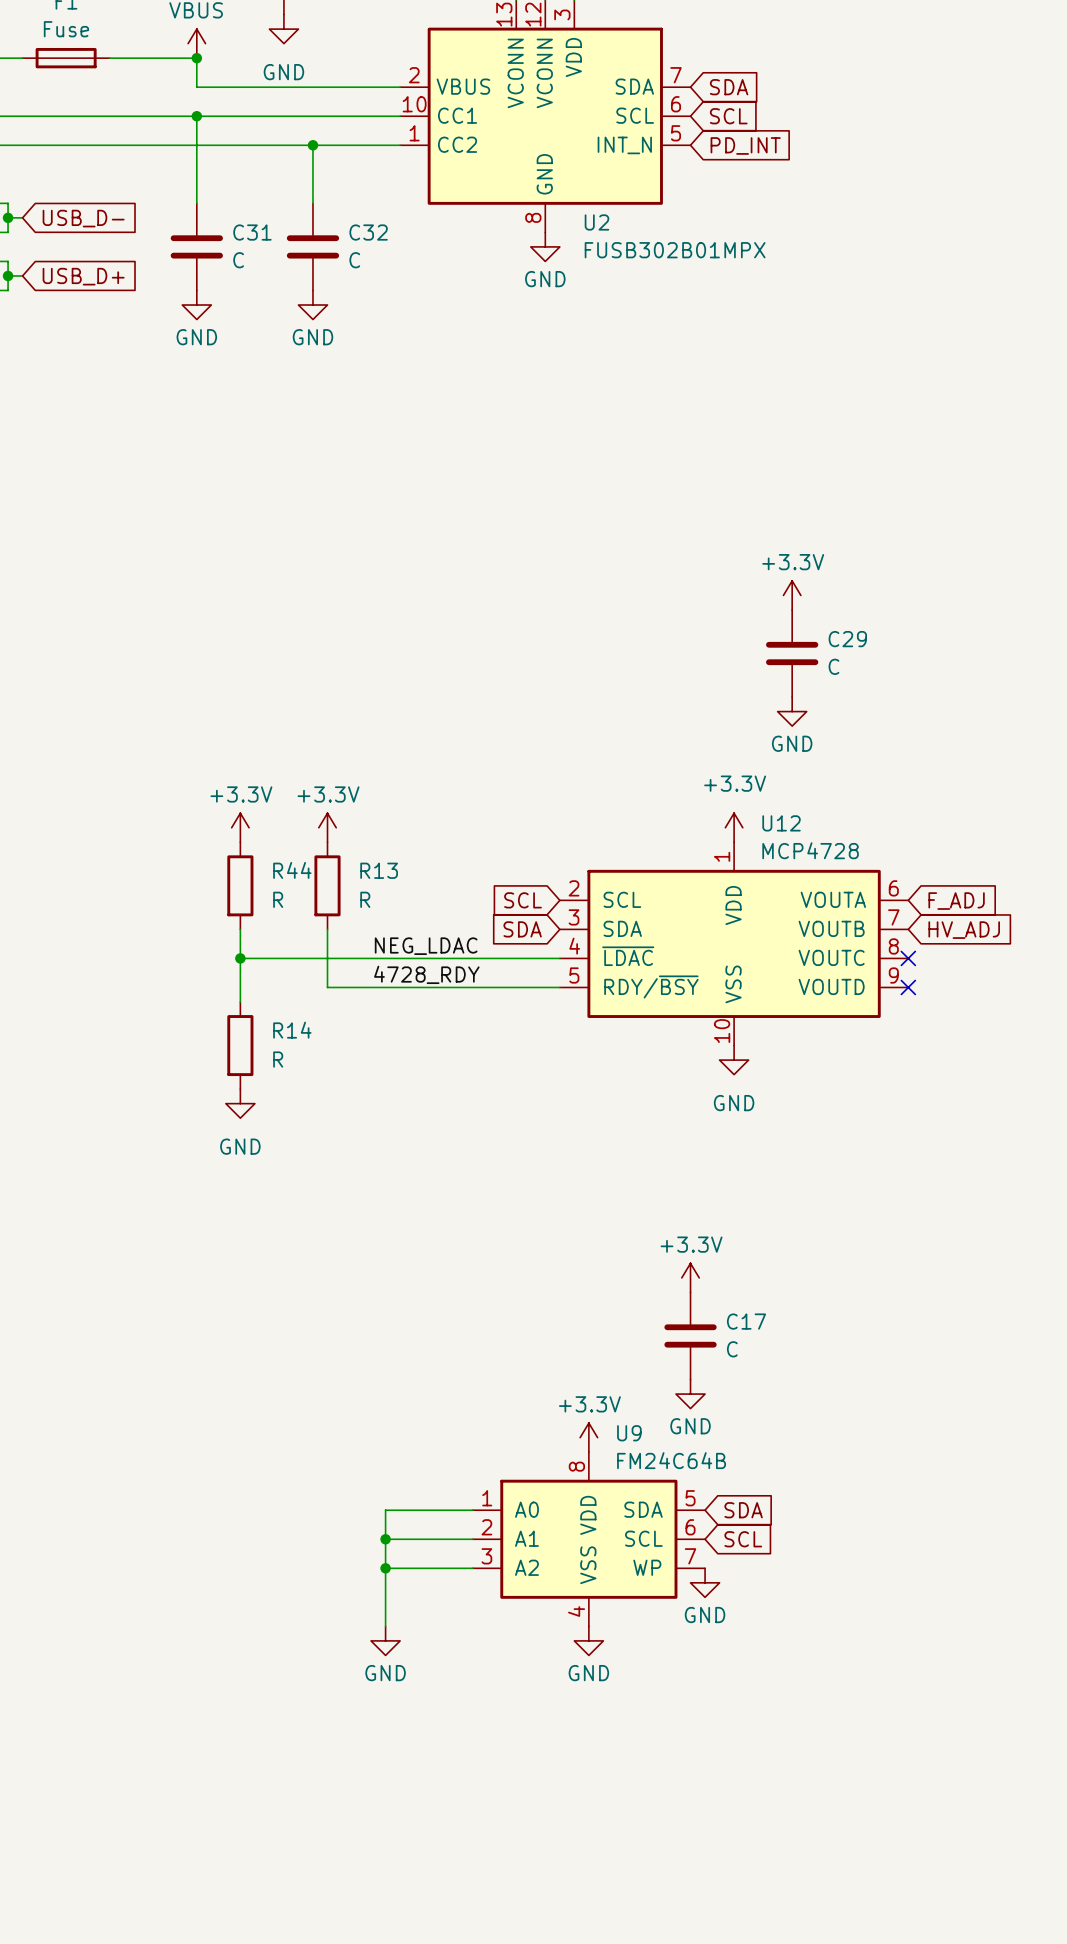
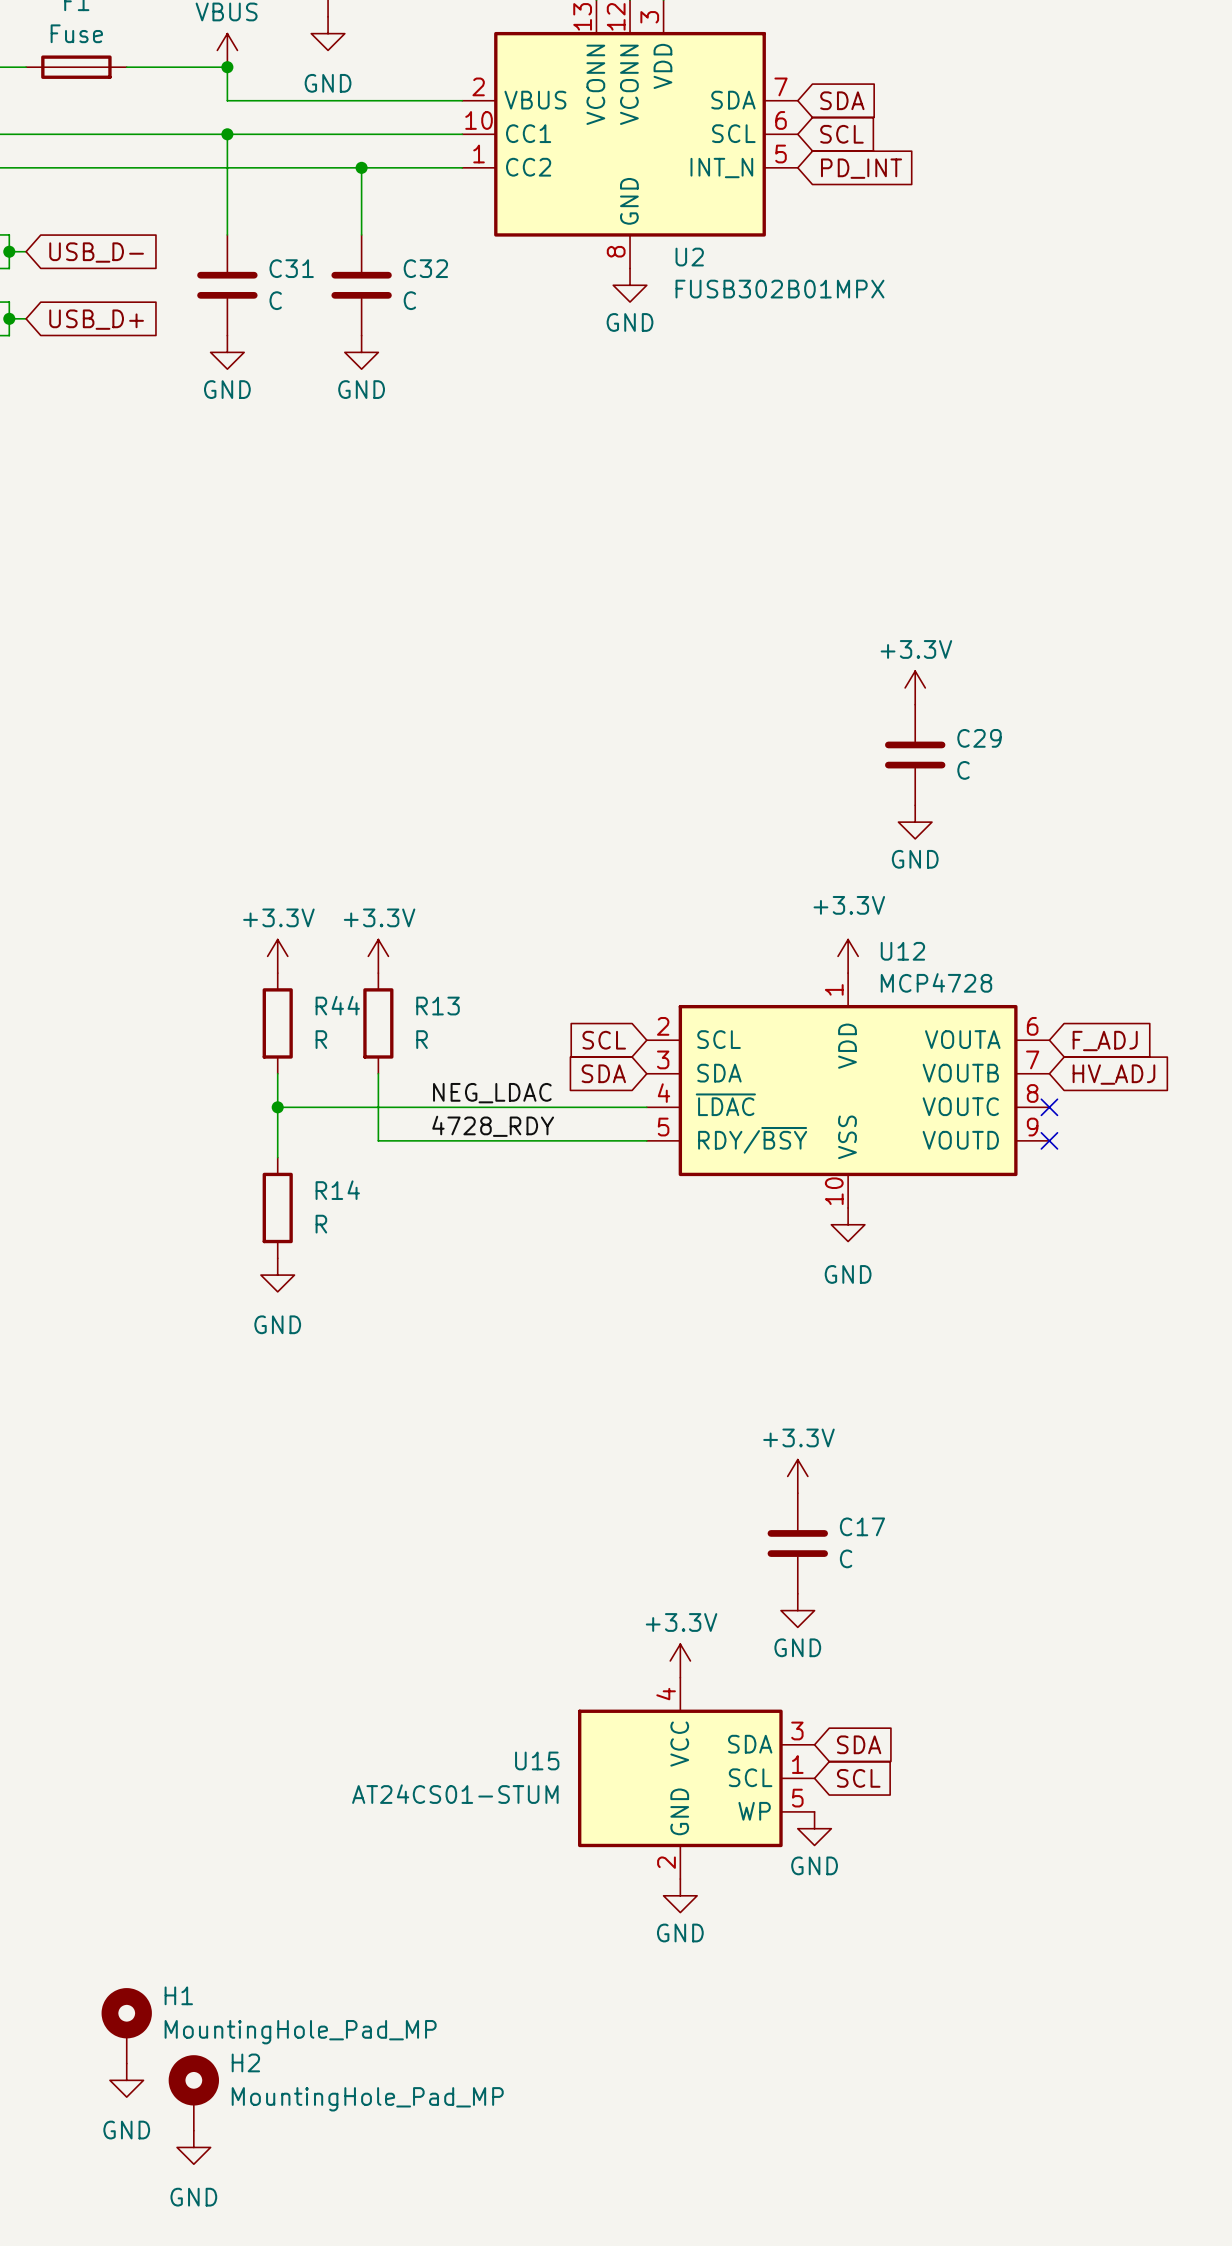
wire: (472, 1510) (385, 1510) (385, 1626) -> none
wire: (385, 1539) (472, 1539) -> none
junction: (385, 1539) -> none
U9: FM24C64B (588, 1539) -> none
U15: none -> AT24CS01-STUM (696, 1778)
wire: (385, 1568) (472, 1568) -> none
junction: (385, 1568) -> none
power symbol: GND (385, 1640) -> none
H1: none -> MountingHole_Pad_MP (126, 2025)
power symbol: none -> GND (126, 2080)
H2: none -> MountingHole_Pad_MP (193, 2092)
power symbol: none -> GND (193, 2147)

